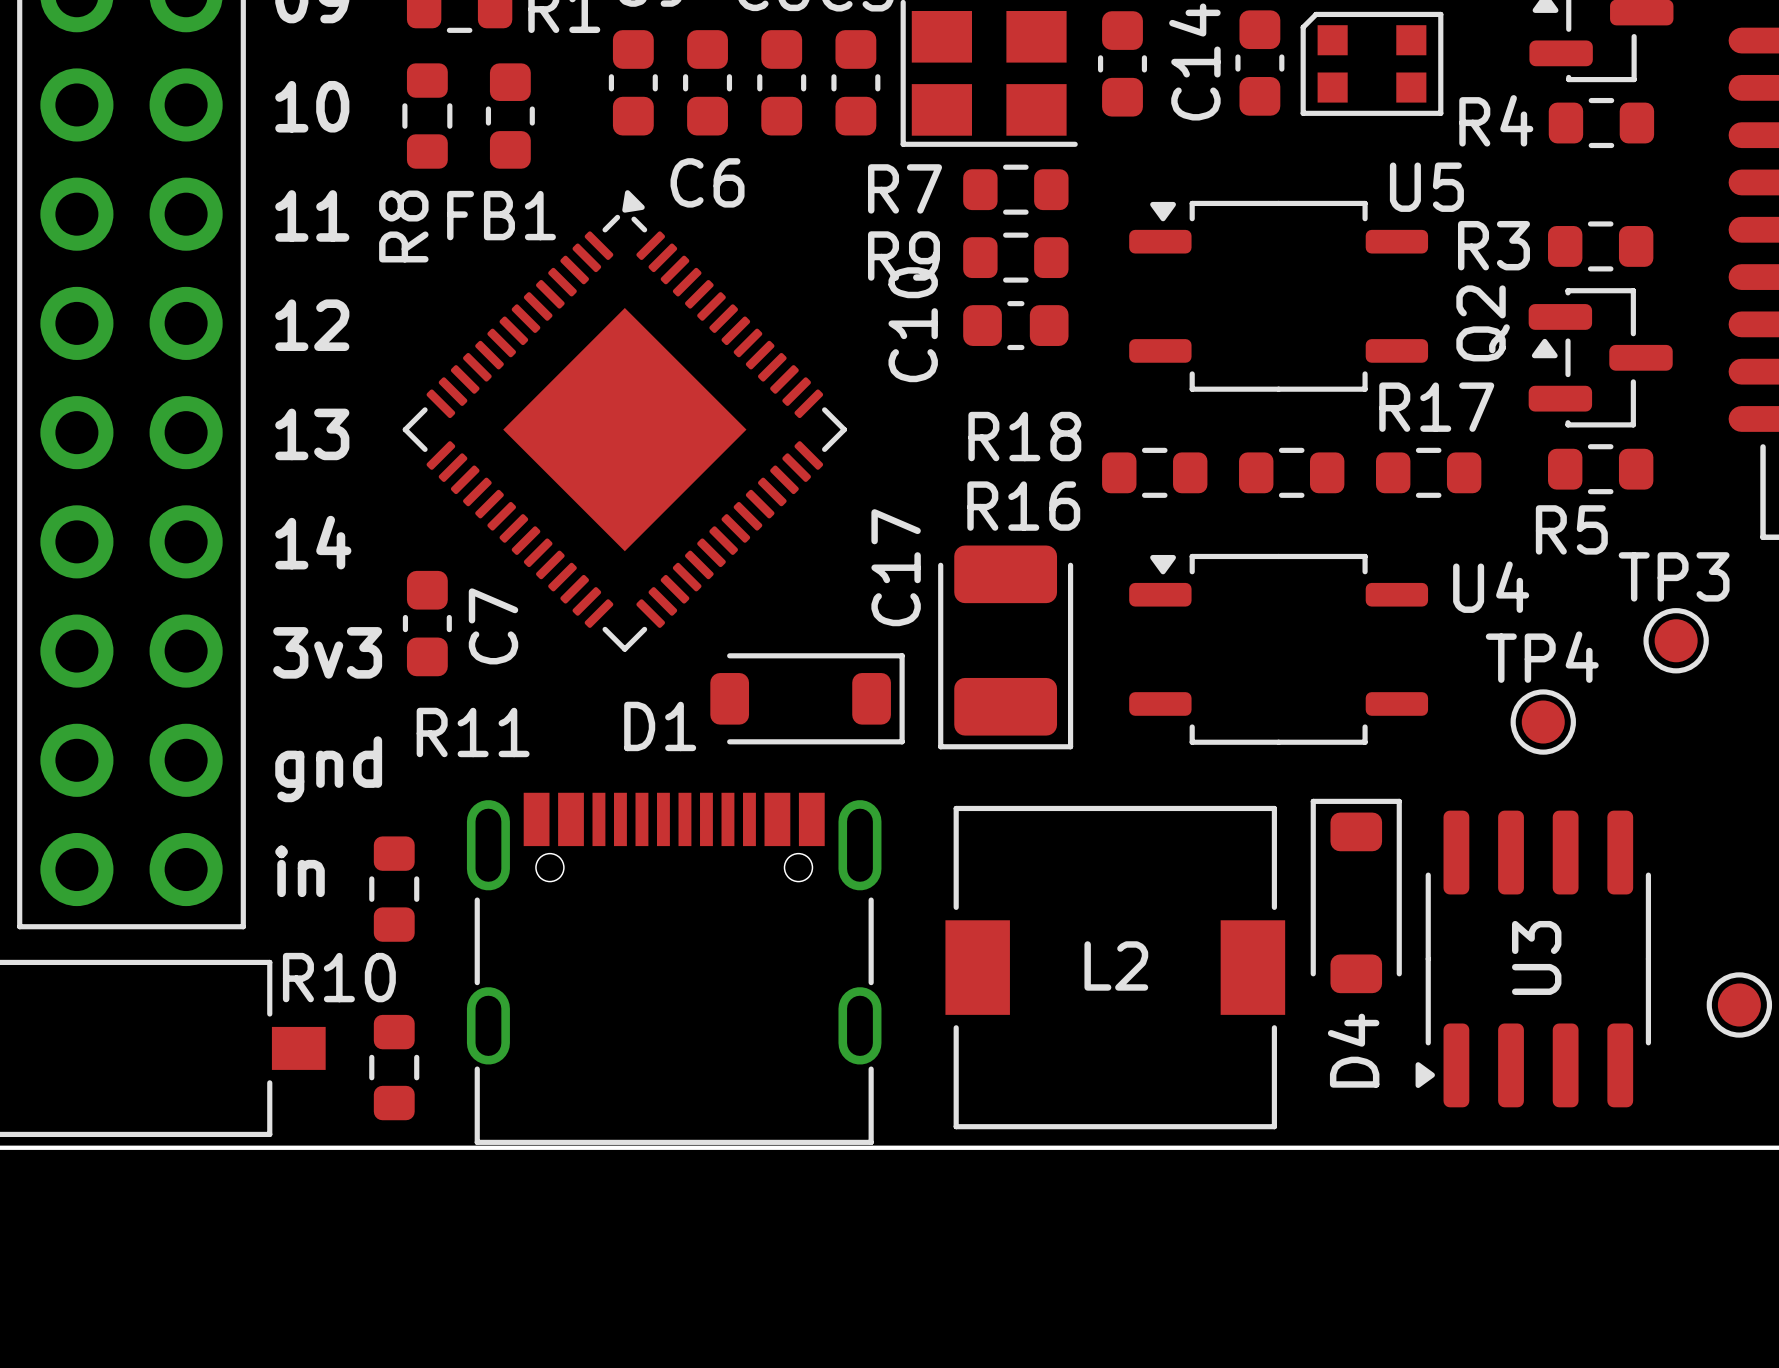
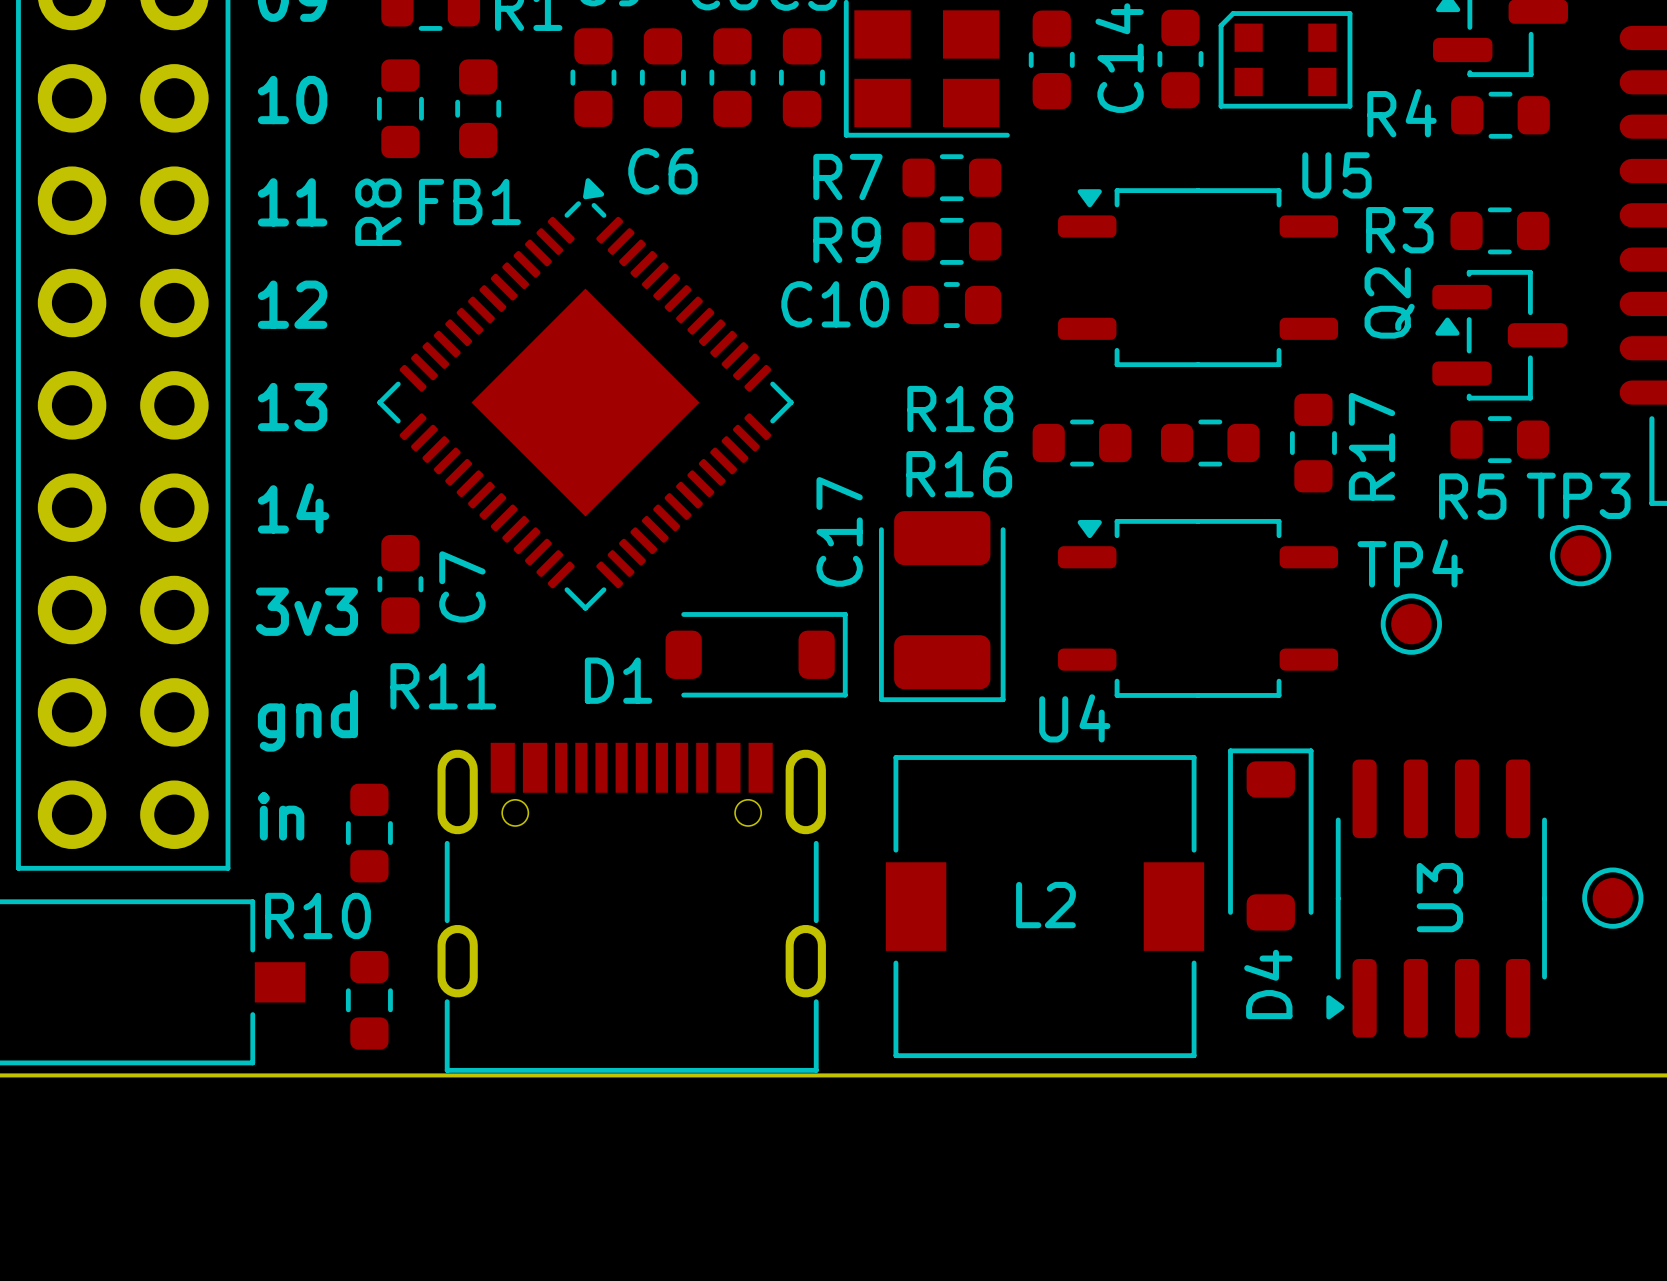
C10 name rotation: 0° (913, 324) -> 90° clockwise (835, 304)
R17 rotation: 0° (1428, 472) -> 90° clockwise (1313, 443)
U4 name position: U4 (1491, 587) -> U4 (1074, 718)
TP3 position: (1676, 640) -> (1580, 555)
TP4 position: (1543, 722) -> (1411, 624)
part position: (1739, 1004) -> (1612, 898)

